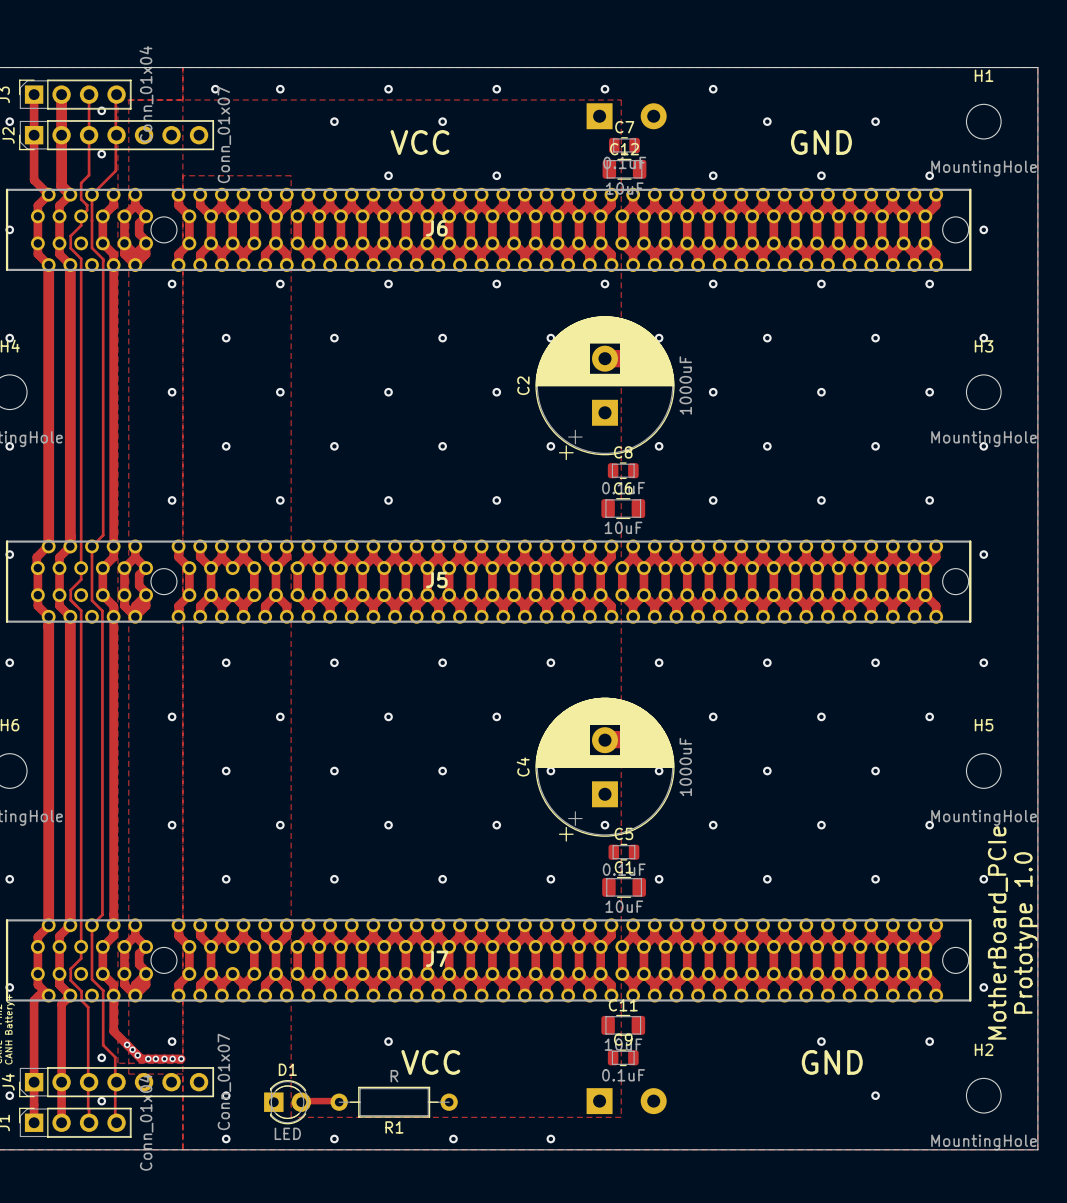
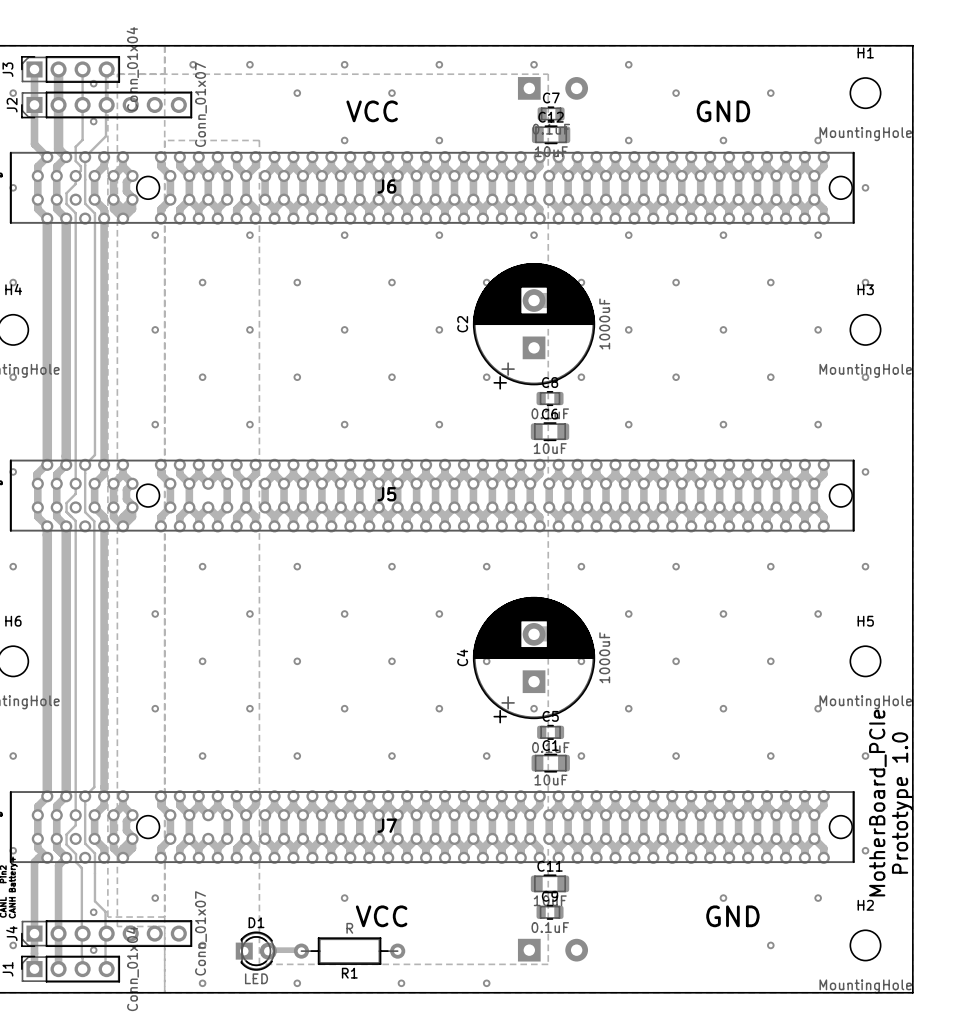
track: (113, 995) (113, 1031) (141, 1058) (181, 1058) -> none
via: (127, 1044) -> none
via: (132, 1049) -> none
via: (137, 1055) -> none
via: (148, 1058) -> none
via: (155, 1058) -> none
via: (164, 1058) -> none
via: (172, 1058) -> none
via: (181, 1058) -> none

